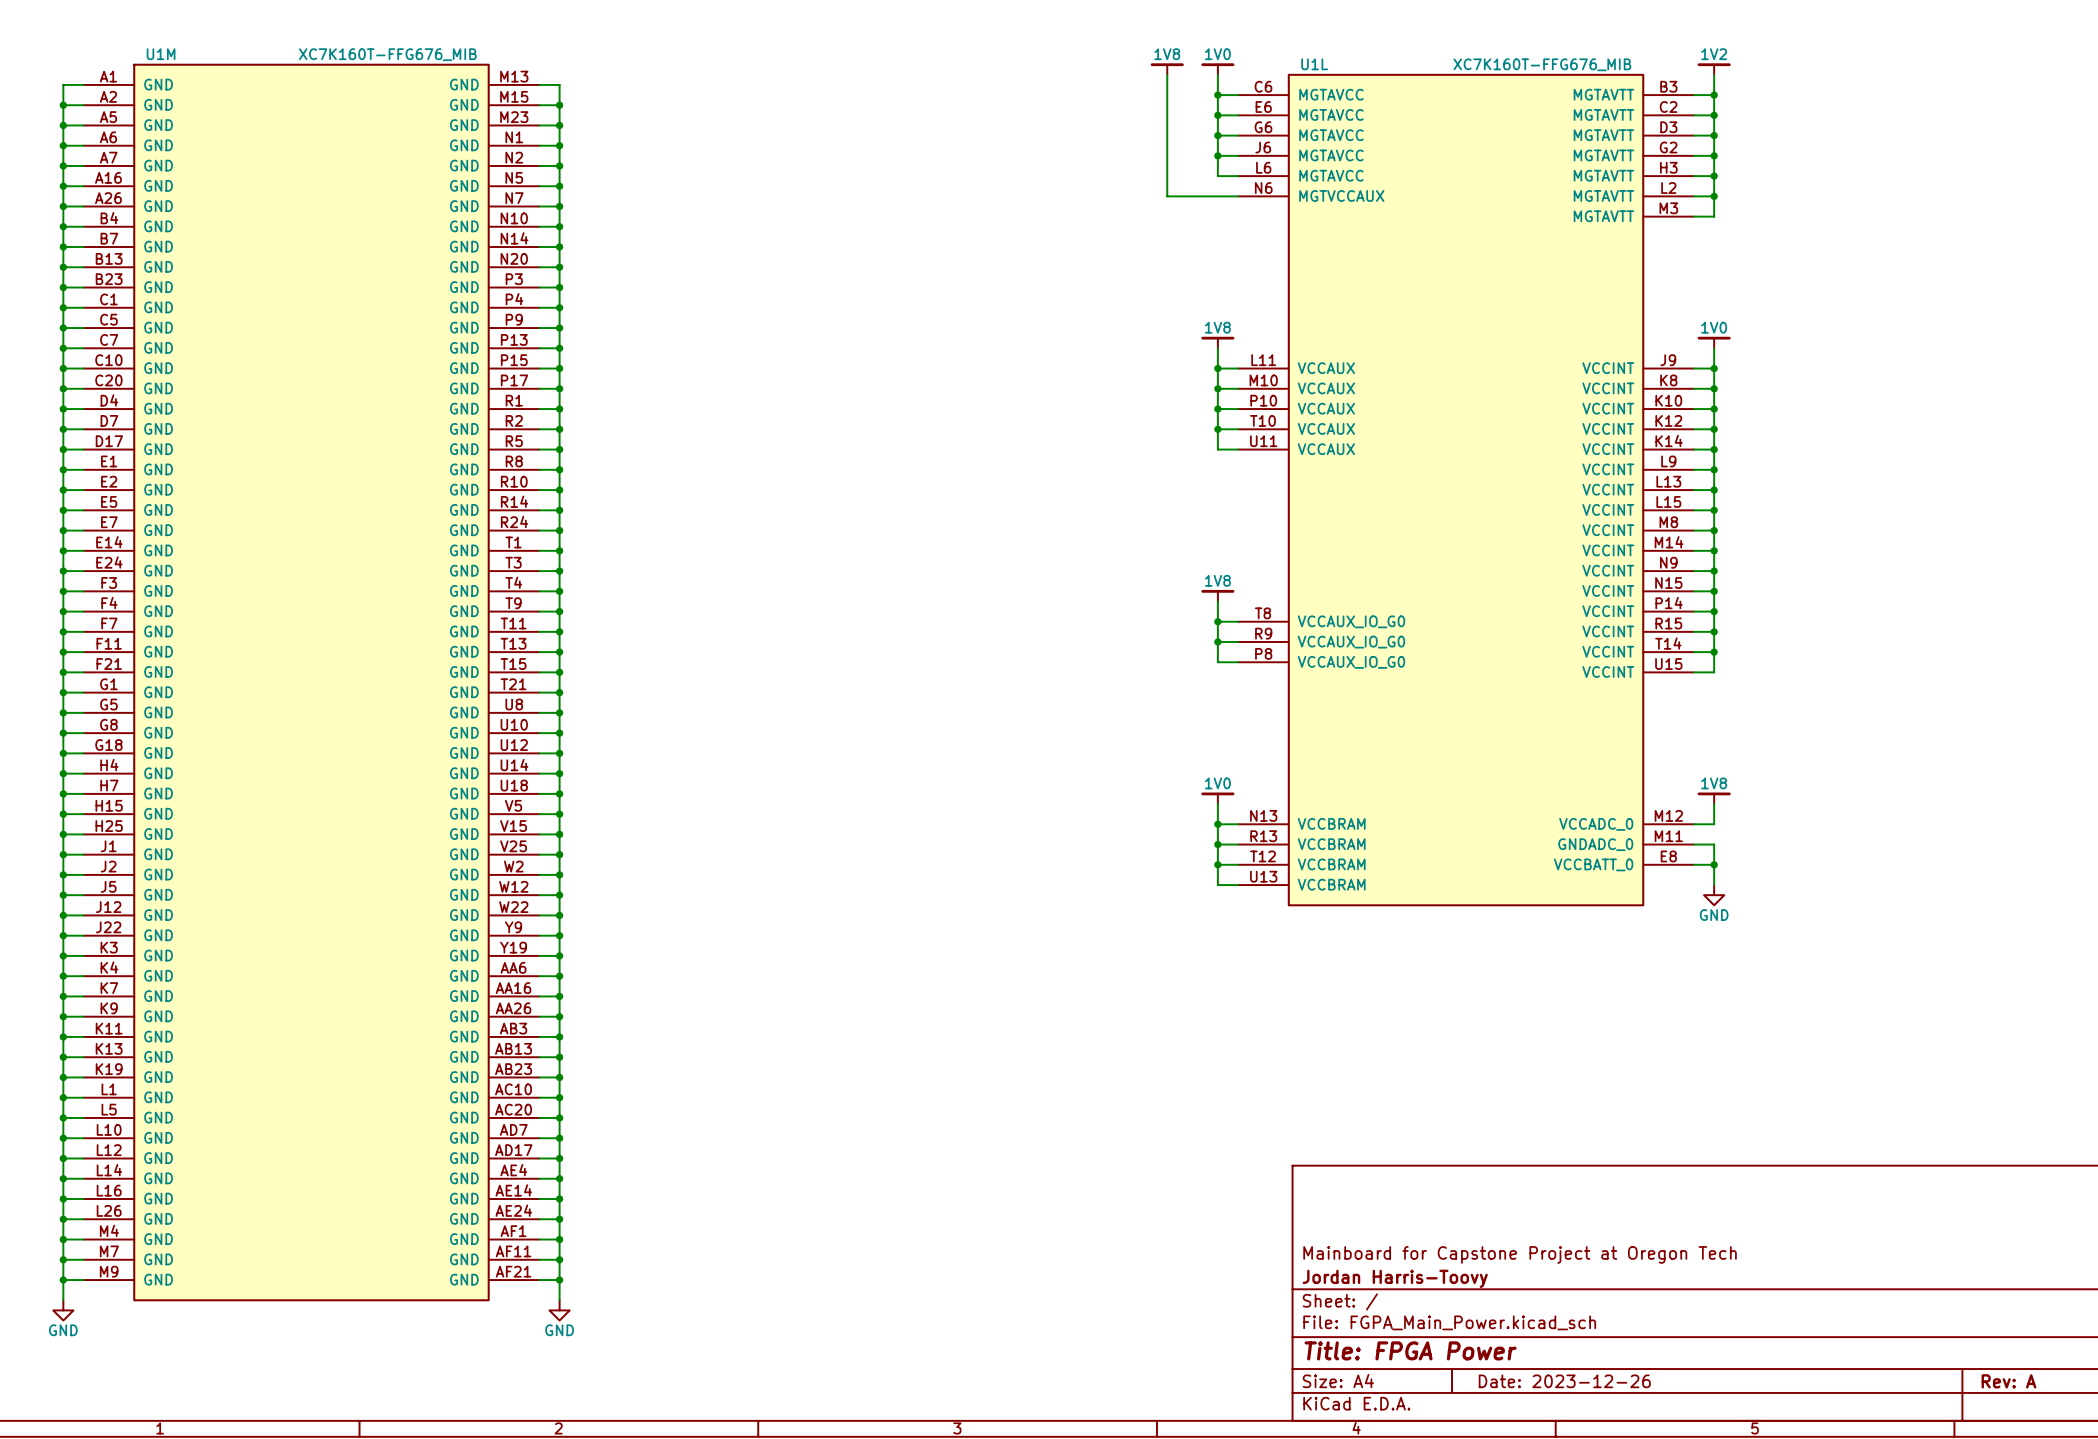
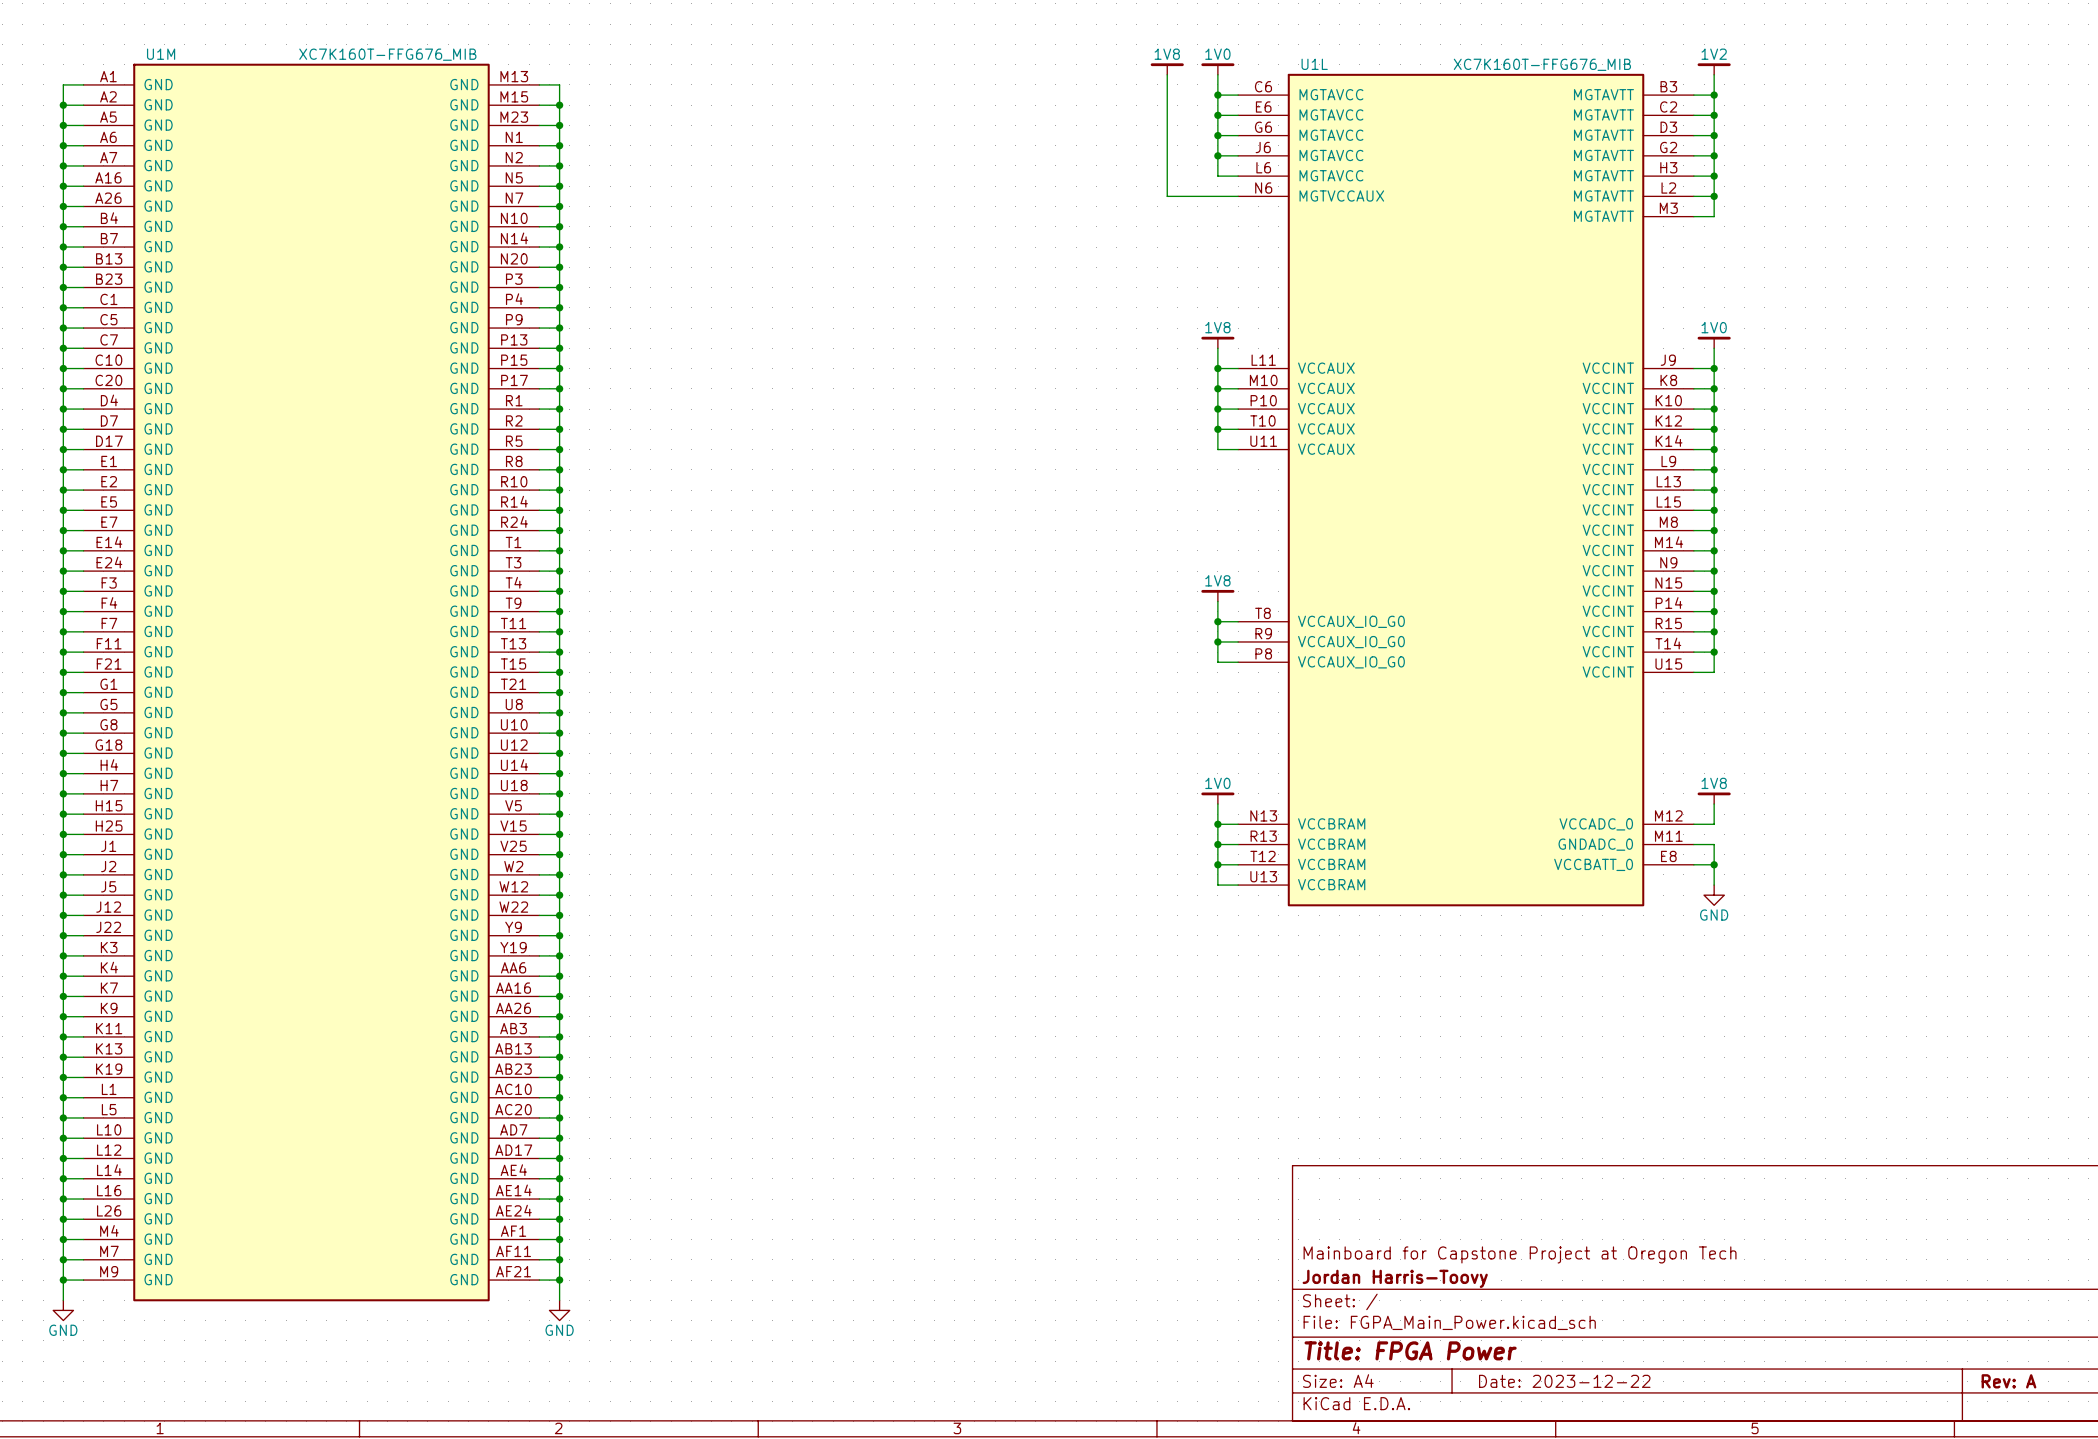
title block: Date: 2023-12-26 (1564, 1381) -> Date: 2023-12-22 (1564, 1381)

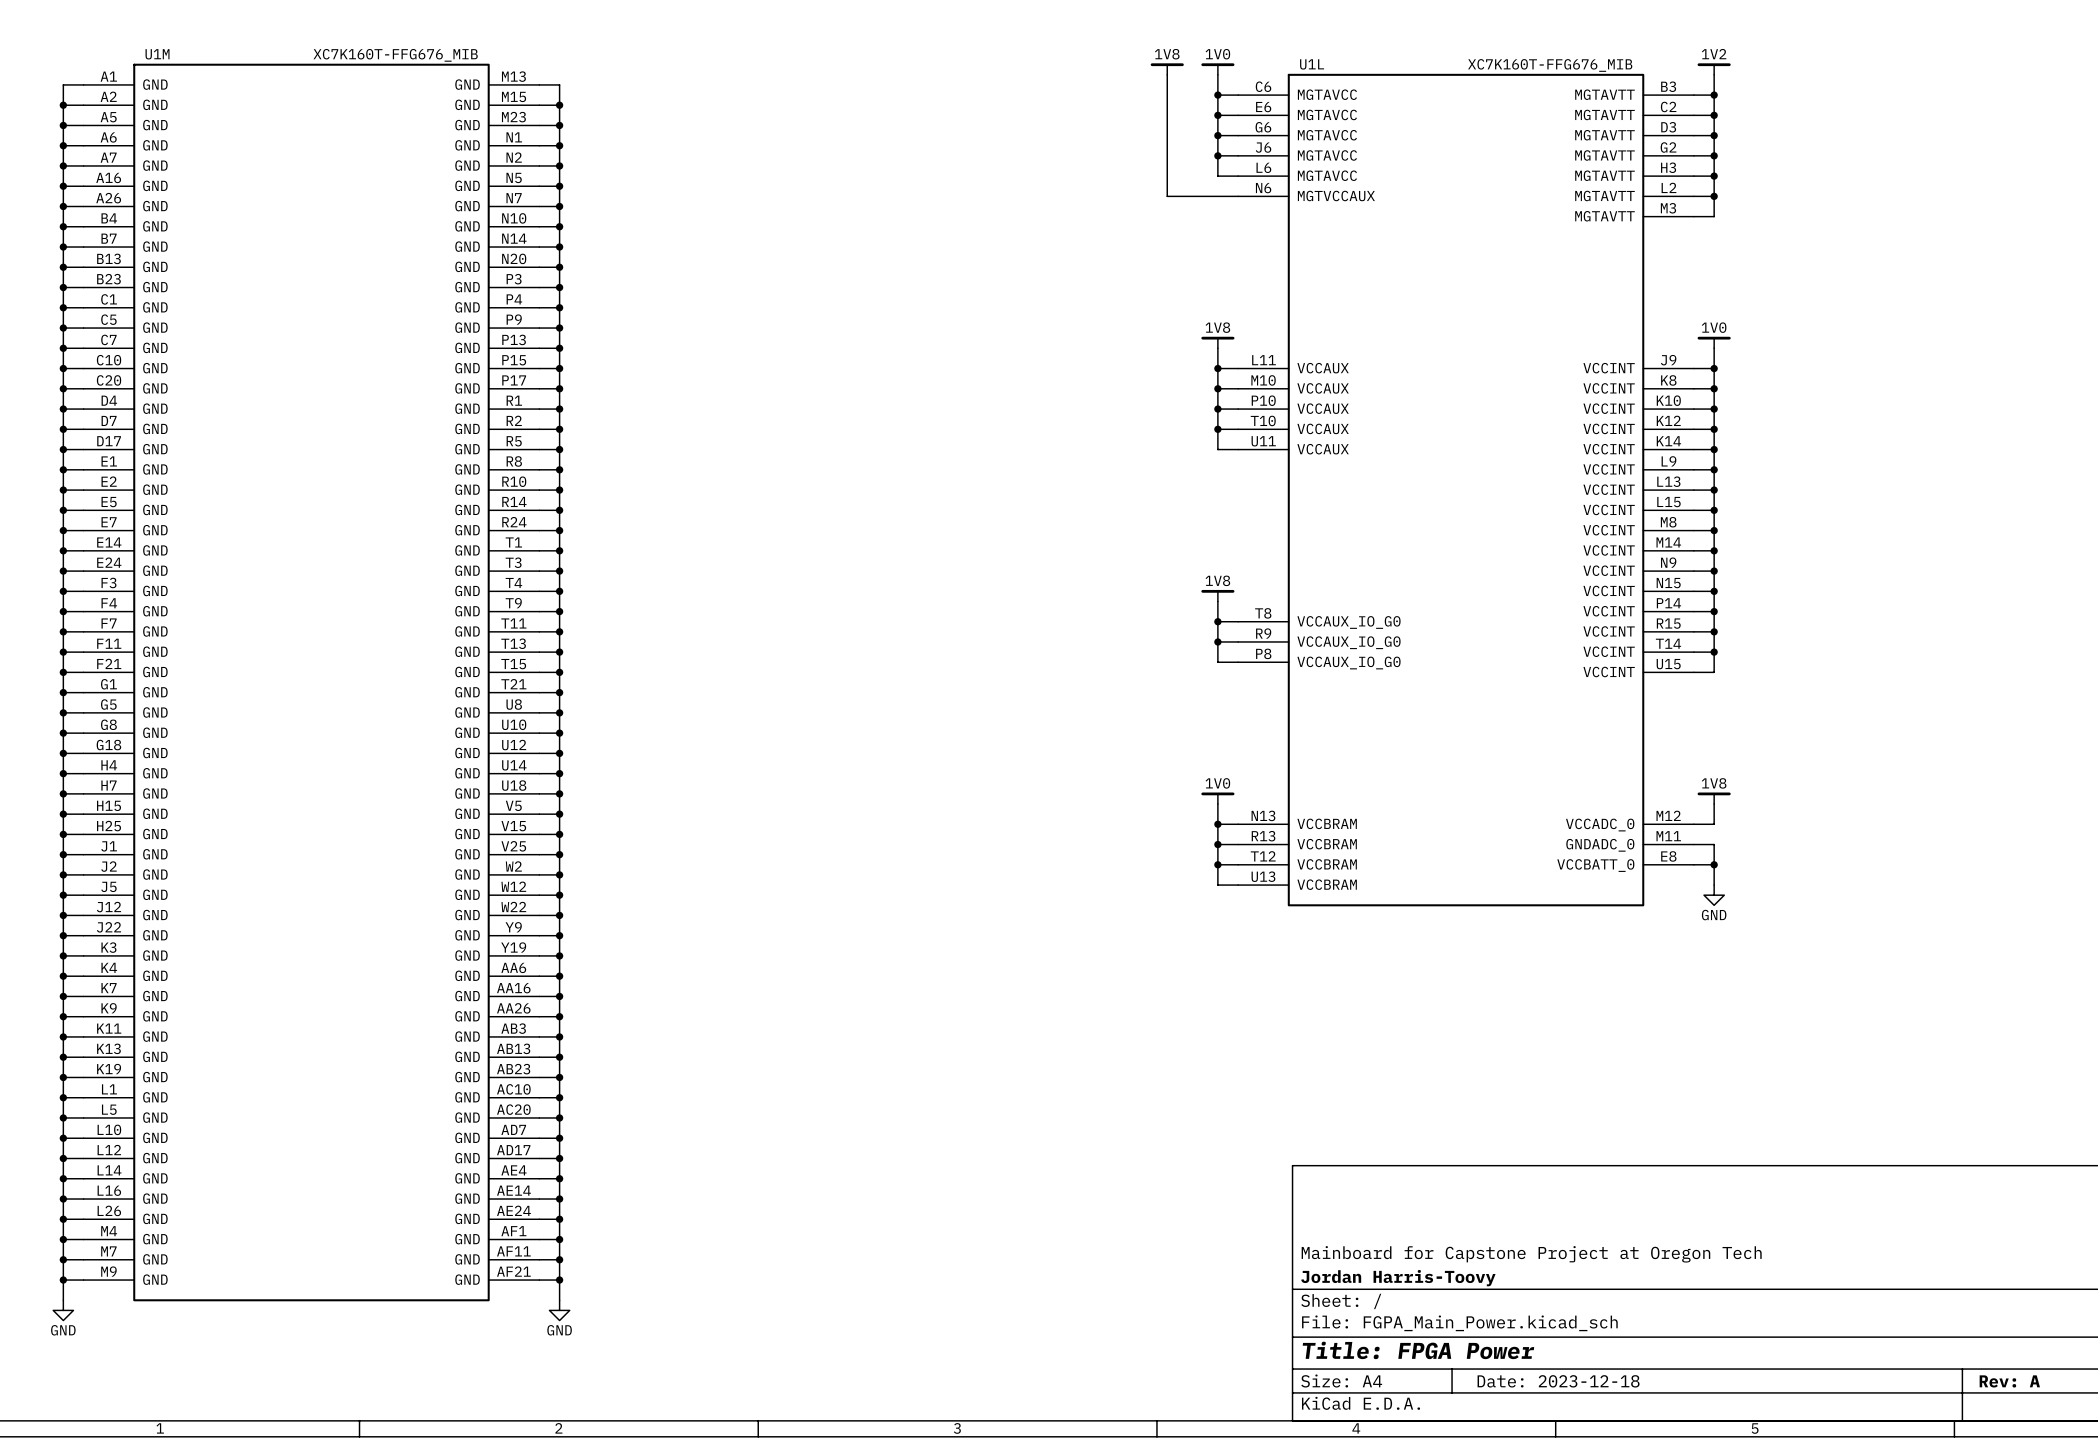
title block: Date: 2023-12-22 (1564, 1381) -> Date: 2023-12-18 (1558, 1381)

